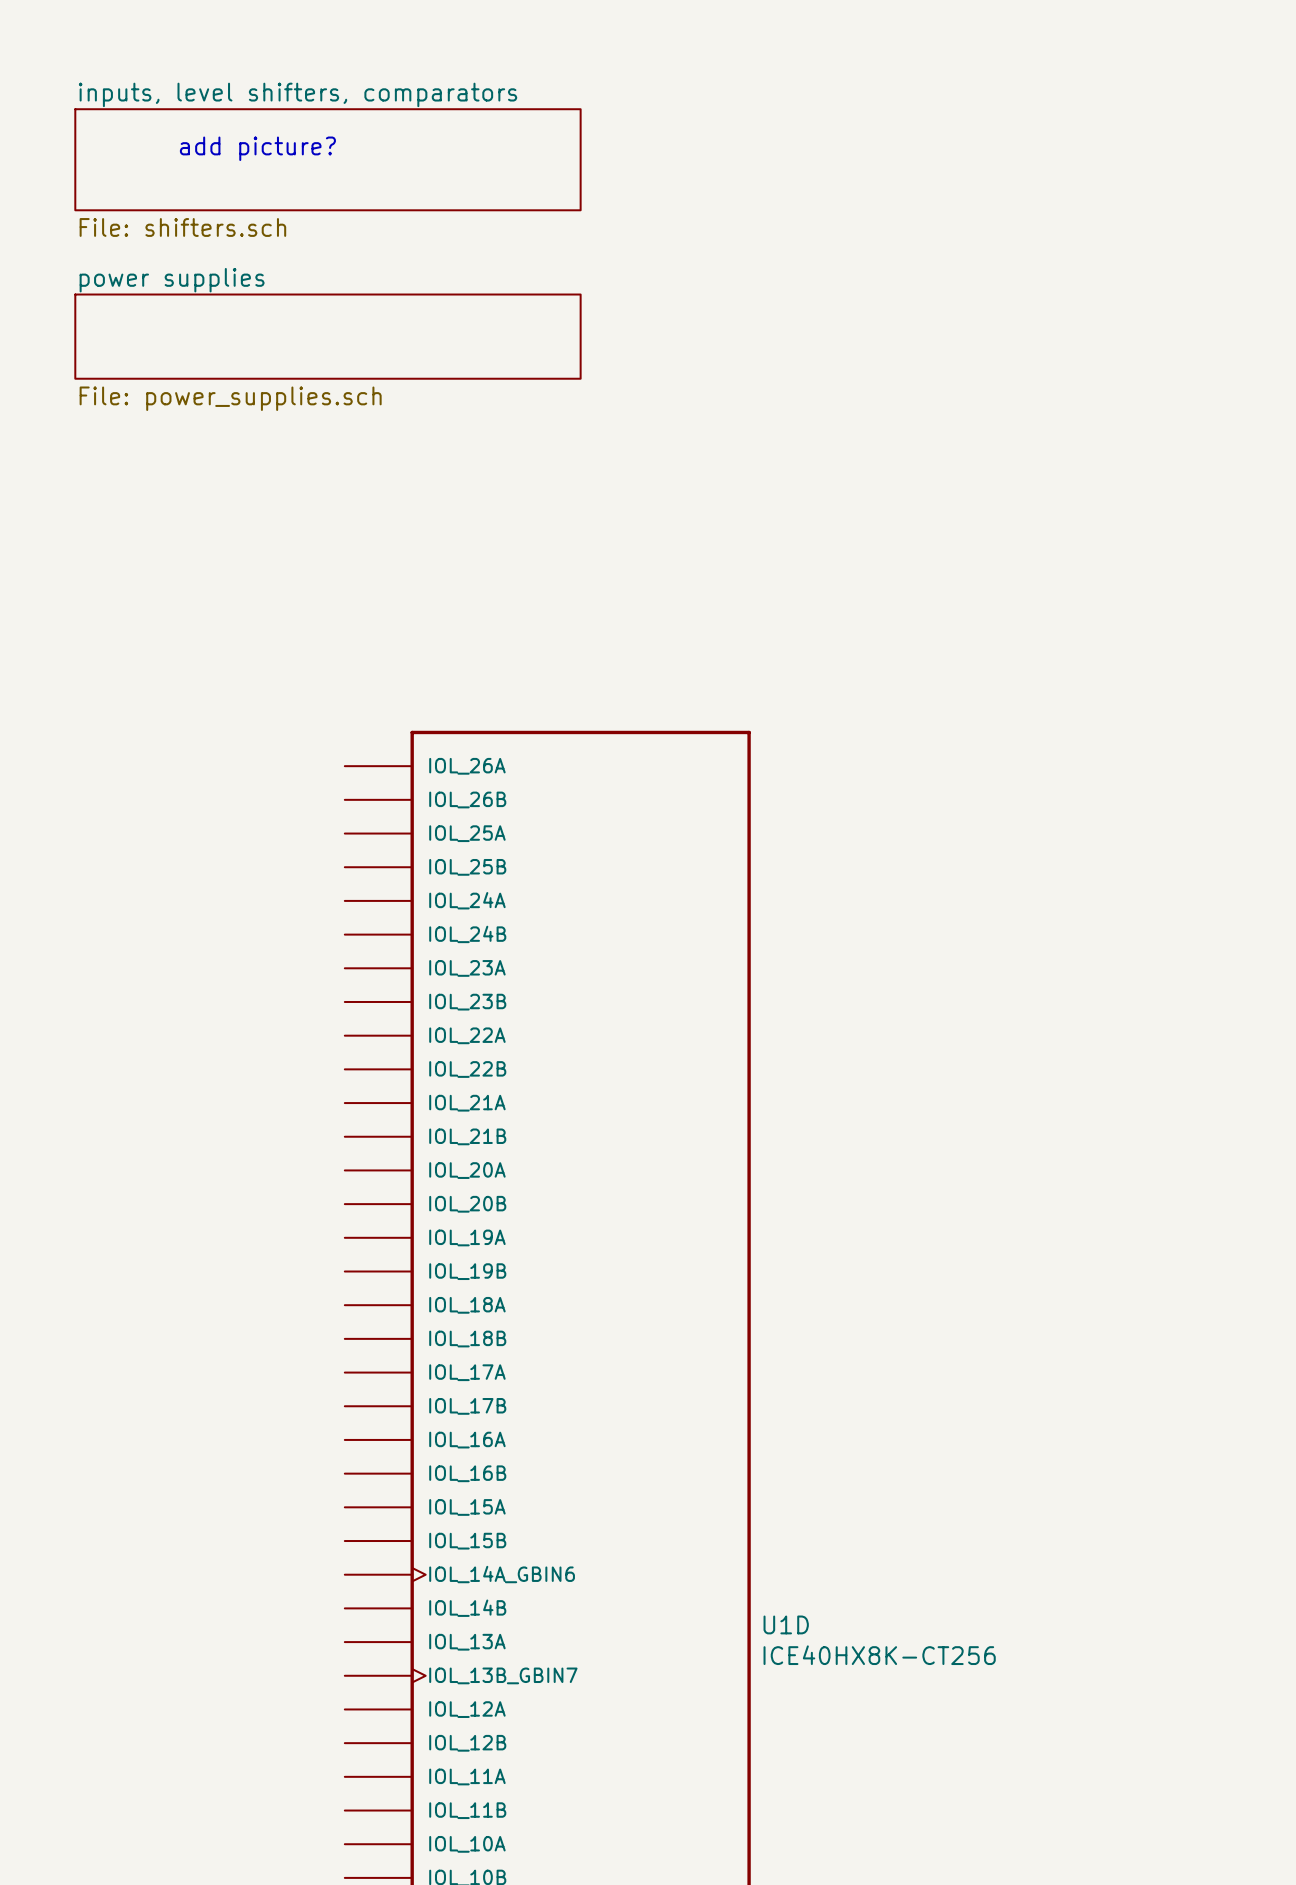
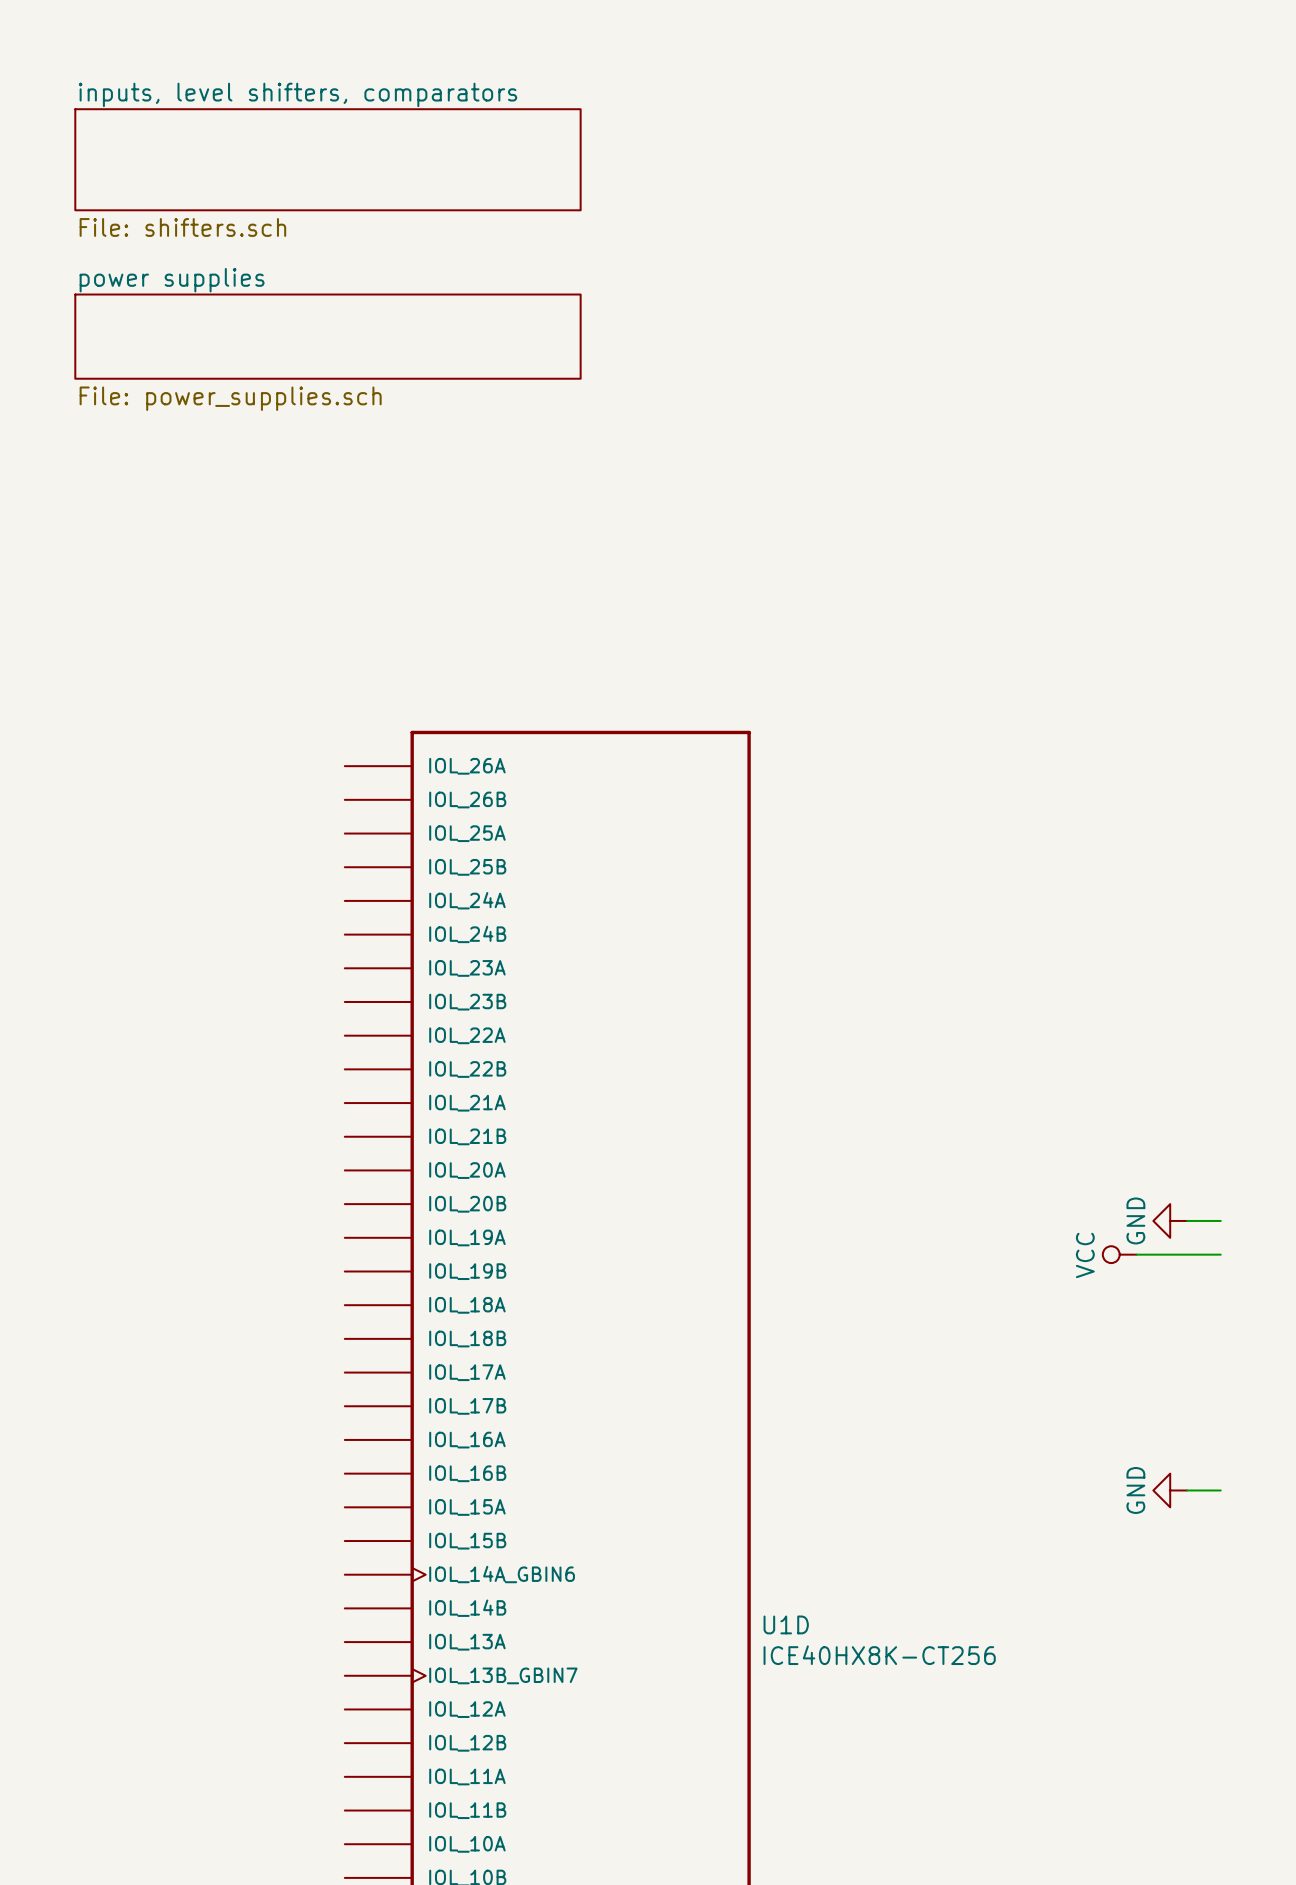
text: add picture? (257, 148) -> none
power symbol: none -> GND (1170, 1220)
wire: none -> (1187, 1220) (1220, 1220)
power symbol: none -> VCC (1119, 1254)
wire: none -> (1136, 1254) (1220, 1254)
power symbol: none -> GND (1170, 1490)
wire: none -> (1187, 1490) (1220, 1490)

